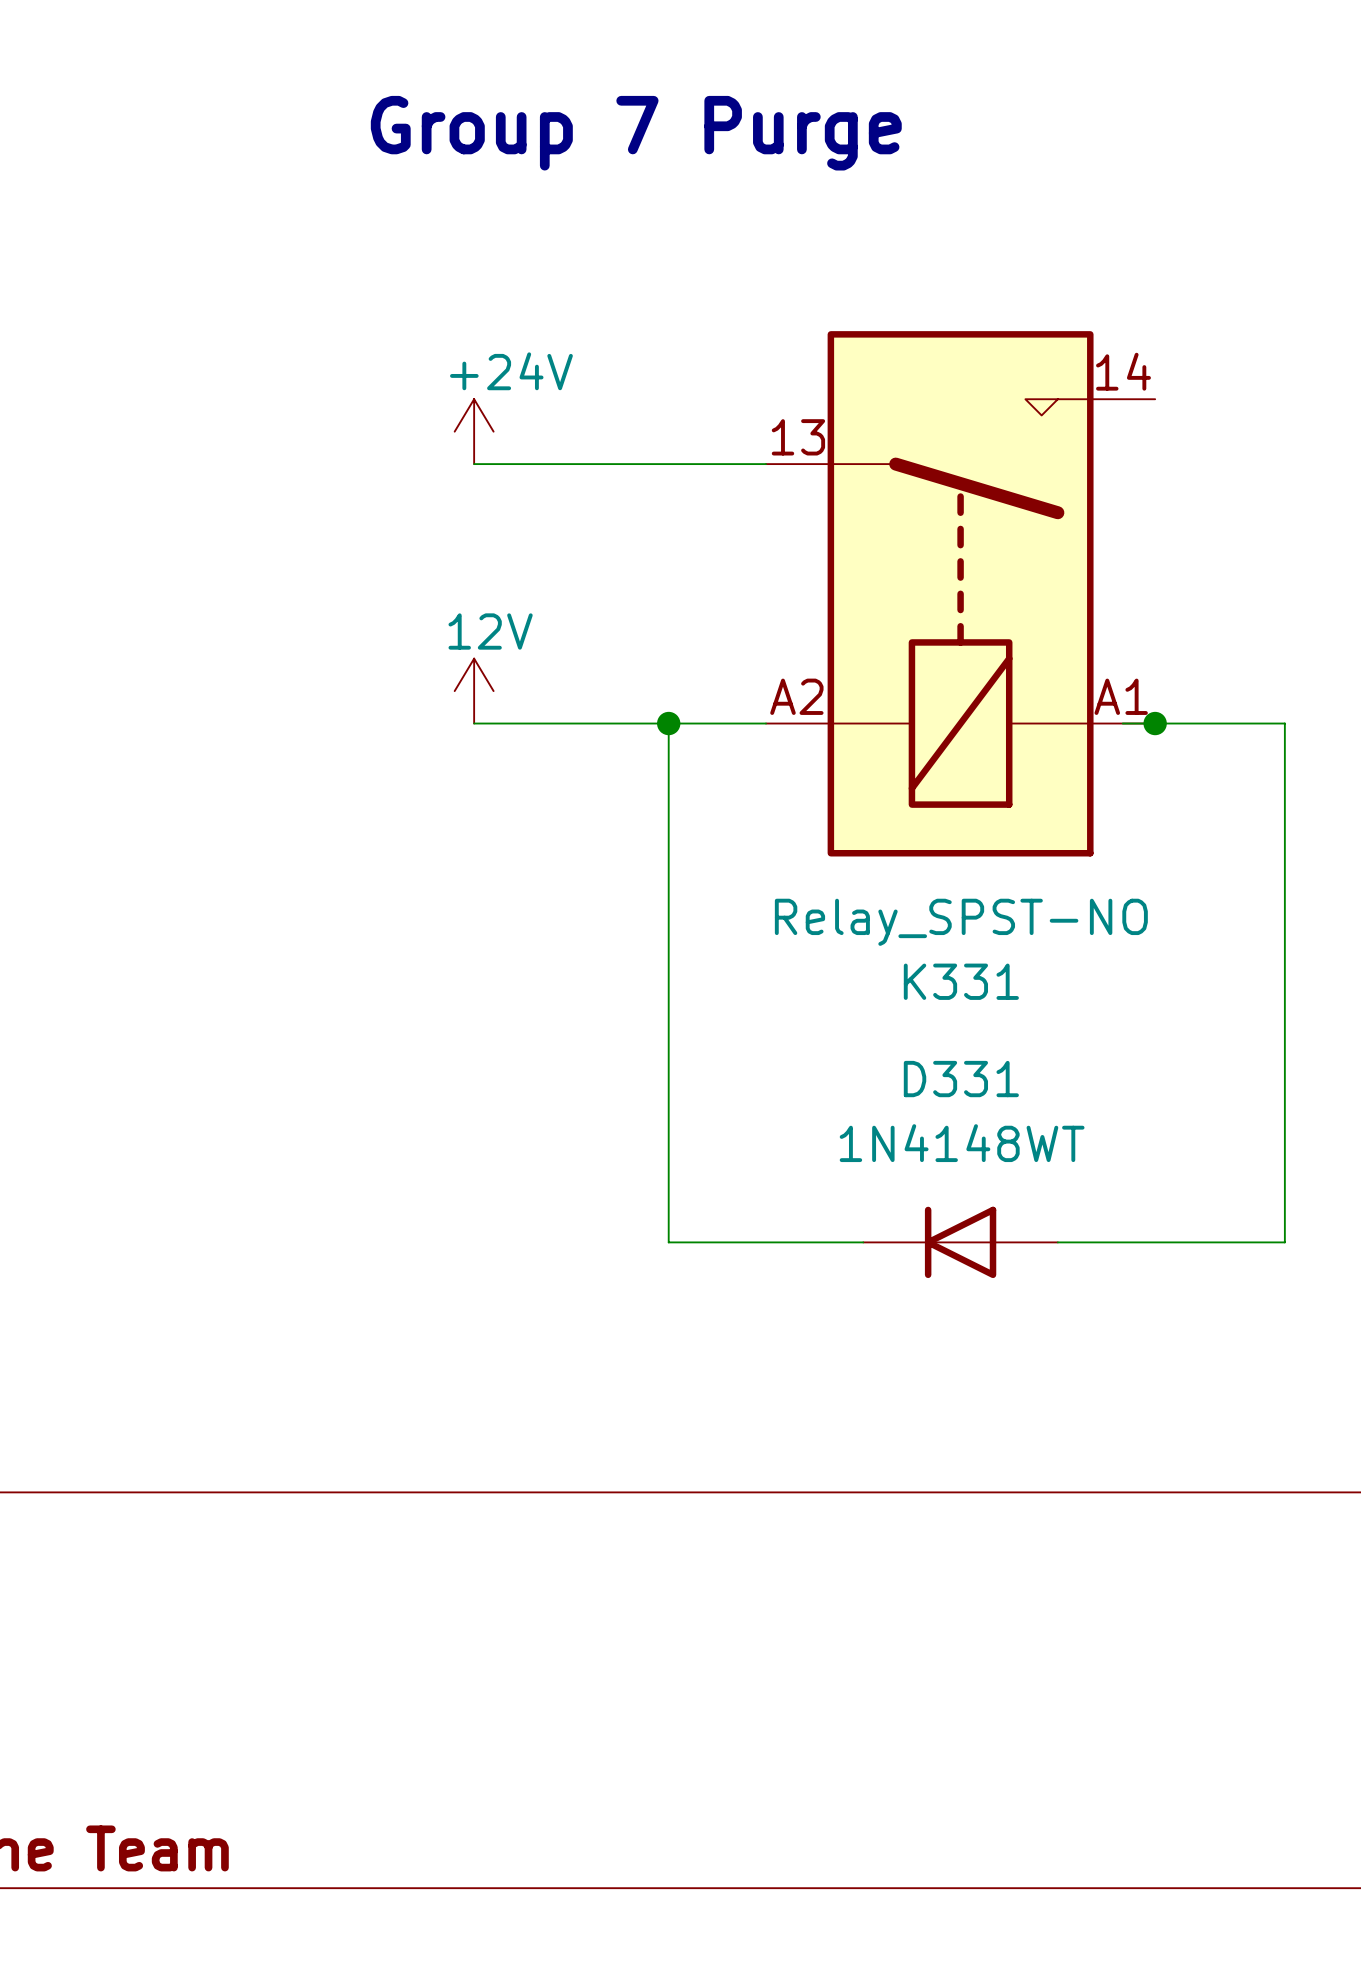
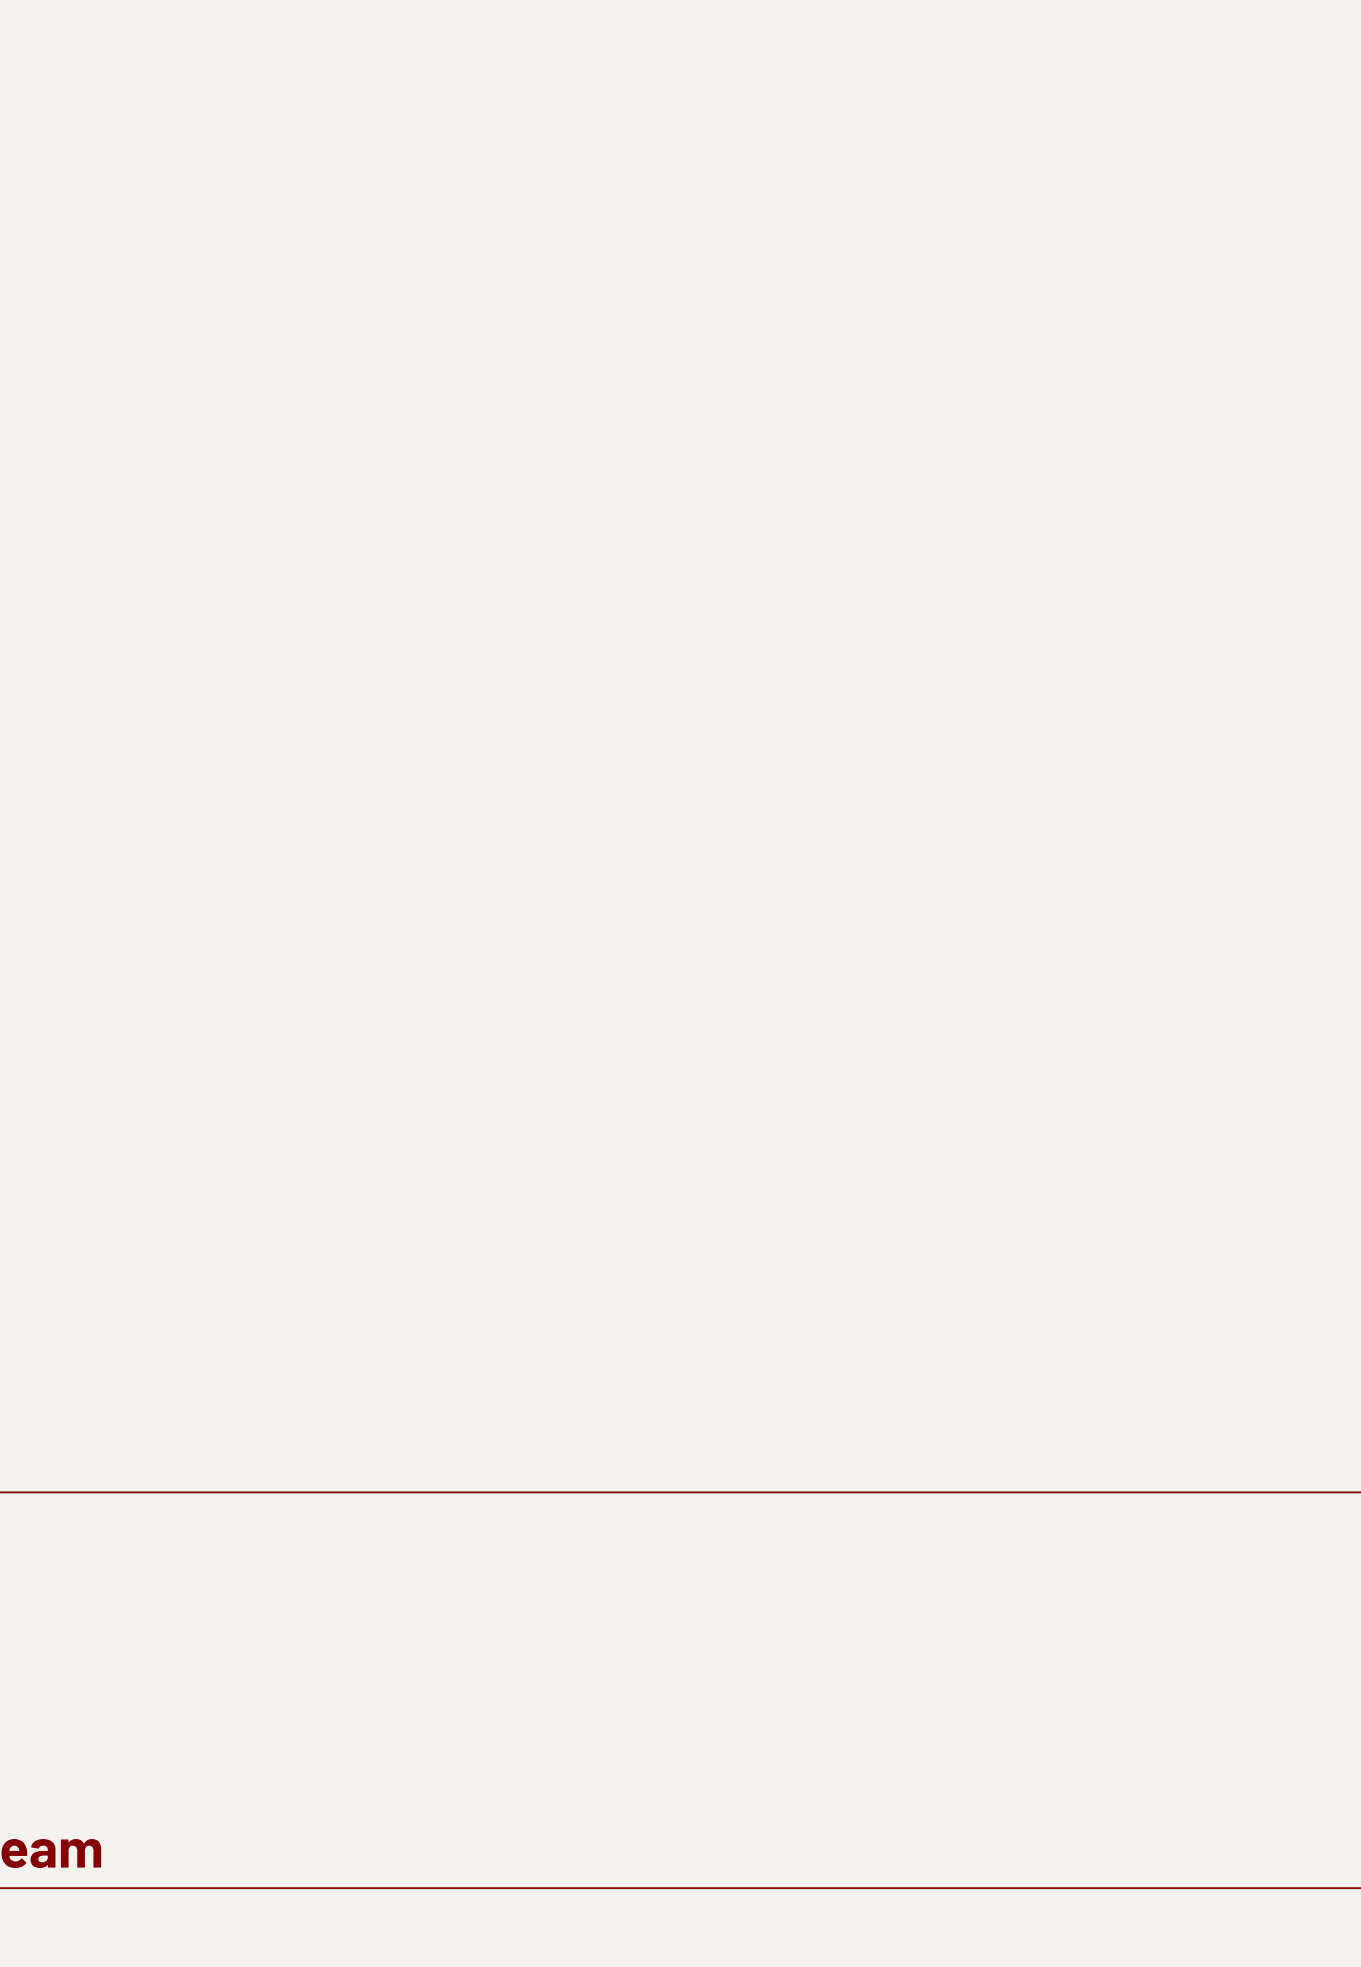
text: Group 7 Purge (636, 133) -> none
power symbol: +24V (474, 431) -> none
wire: (474, 464) (766, 464) -> none
K331: Relay_SPST-NO (960, 593) -> none
power symbol: 12V (474, 691) -> none
wire: (474, 723) (766, 723) -> none
wire: (668, 723) (668, 1242) (863, 1242) -> none
junction: (668, 723) -> none
wire: (1122, 723) (1284, 723) (1284, 1242) (1057, 1242) -> none
junction: (1155, 723) -> none
D331: 1N4148WT (960, 1242) -> none

